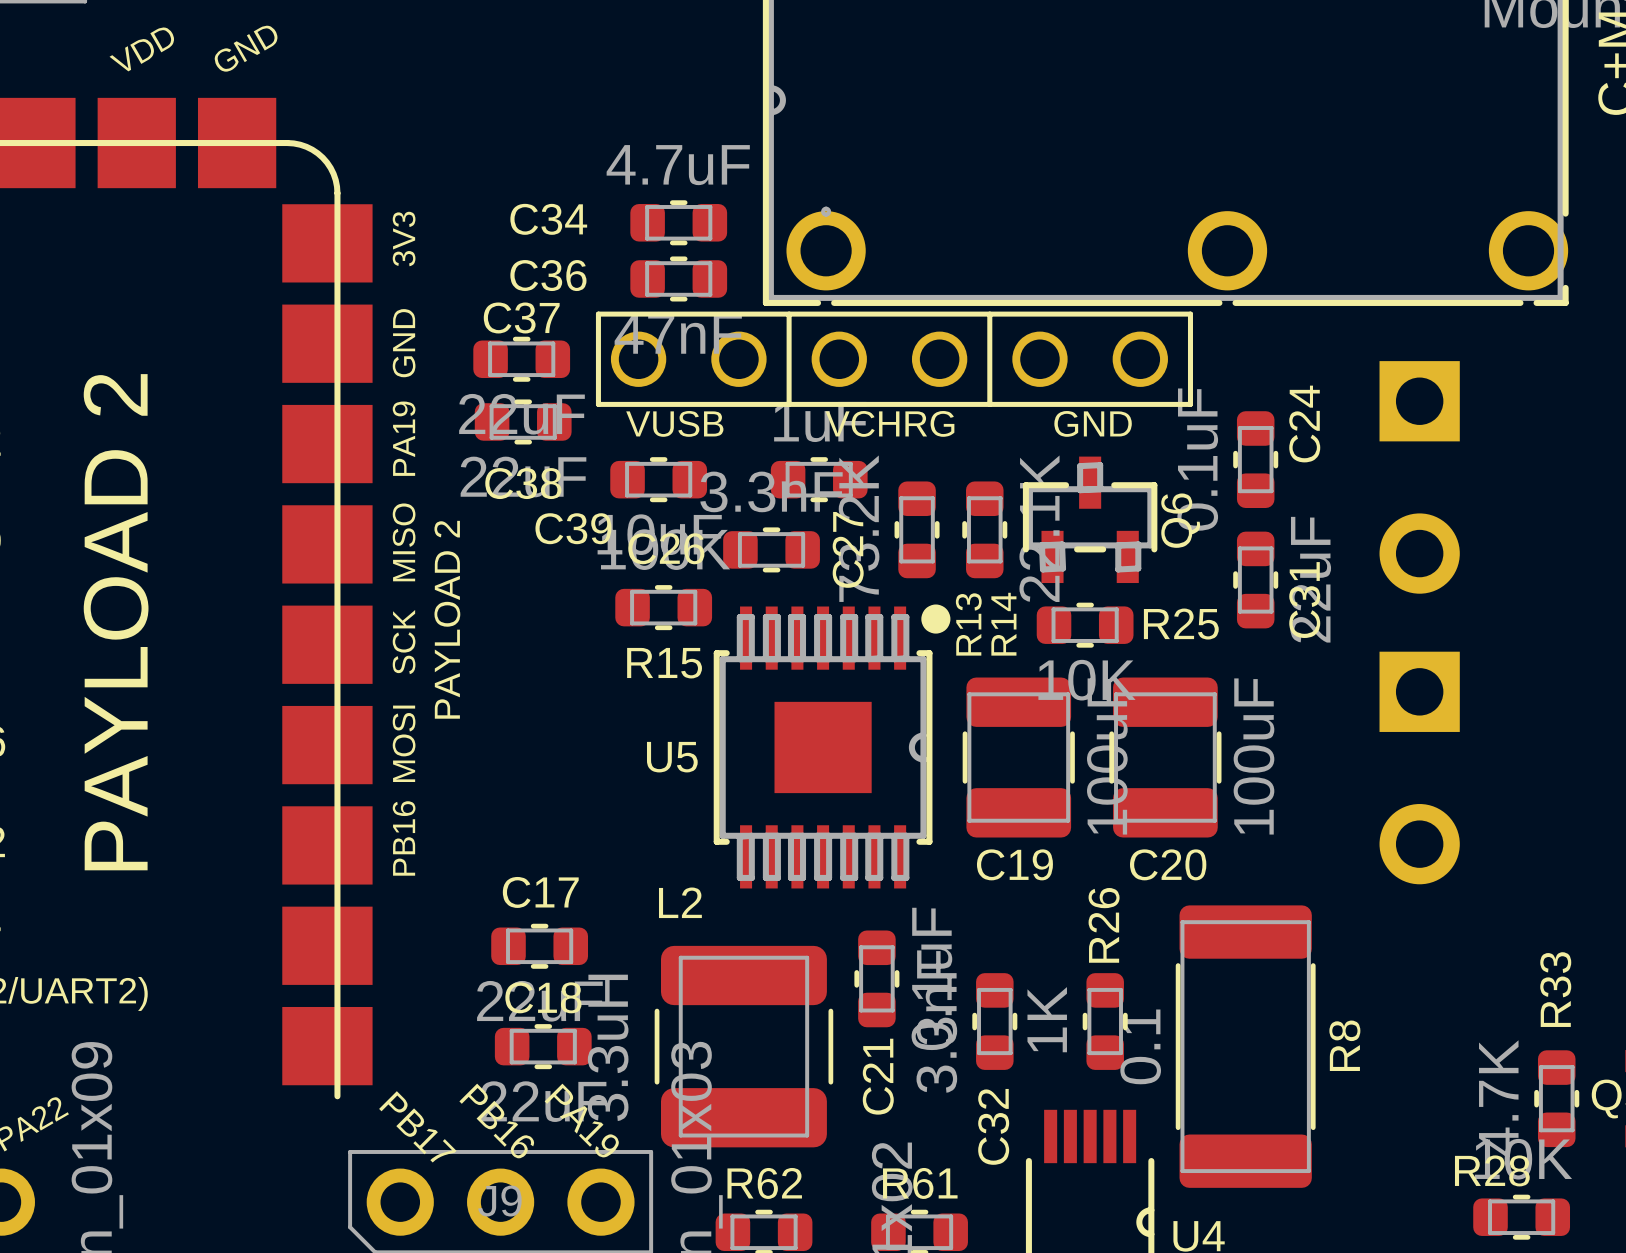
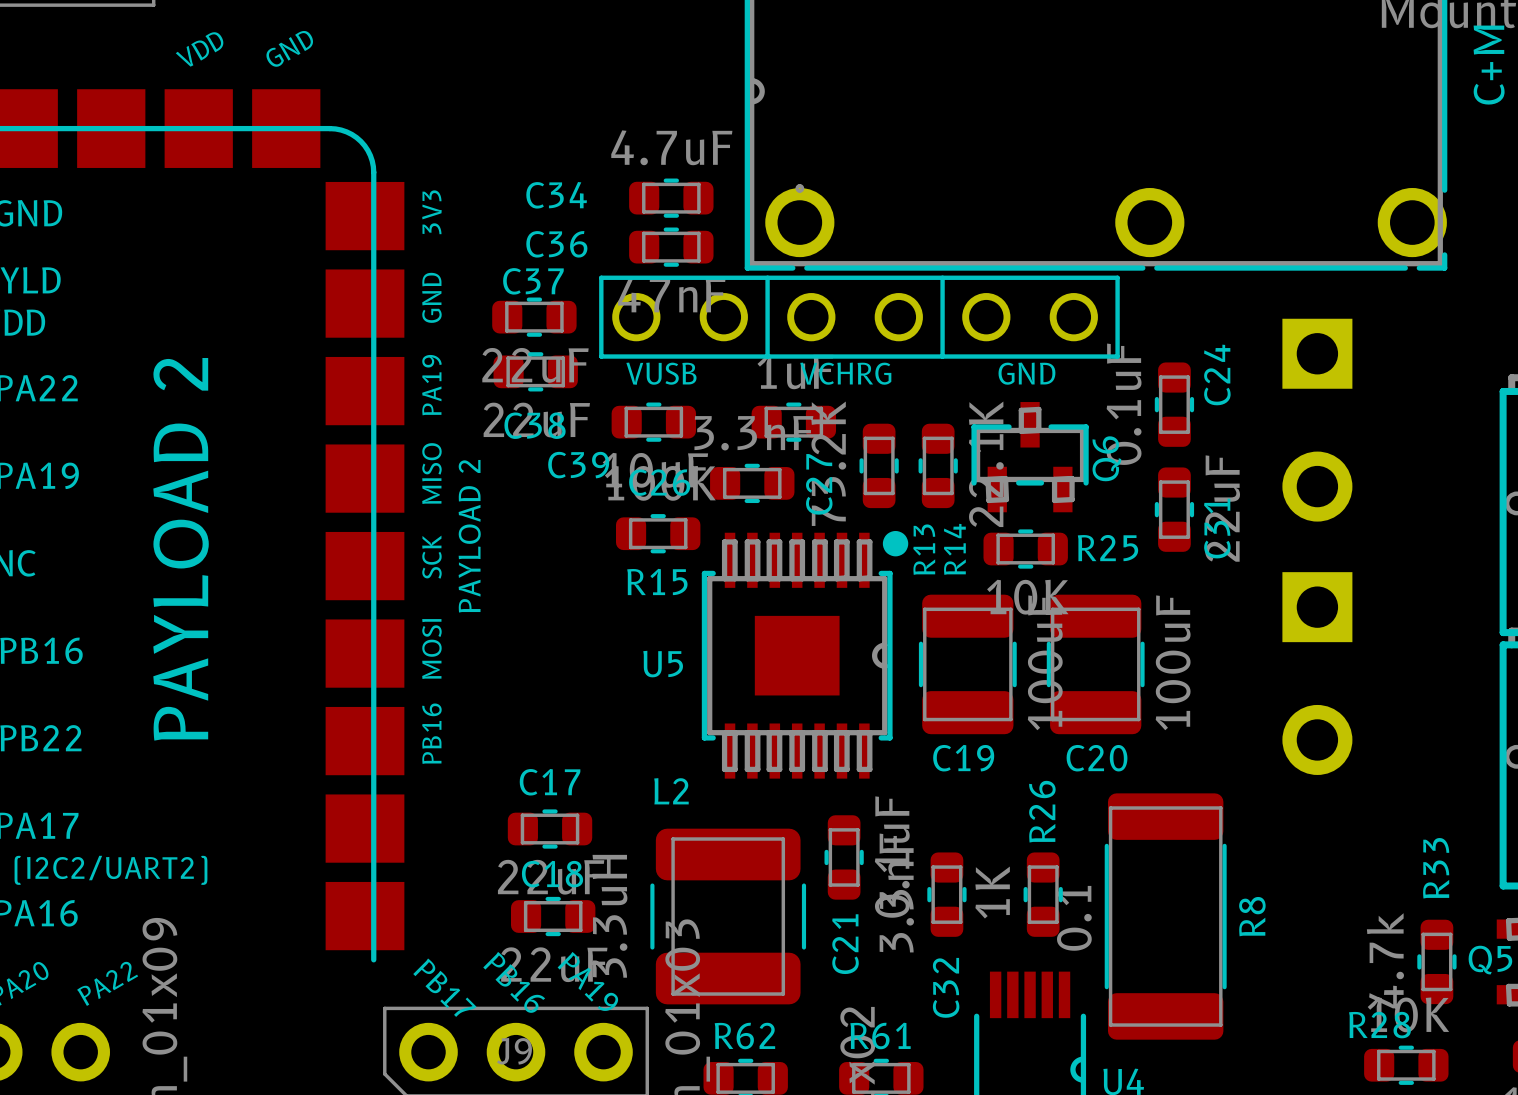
R33 value: 4.7K (1498, 1098) -> 4.7k (1385, 960)

